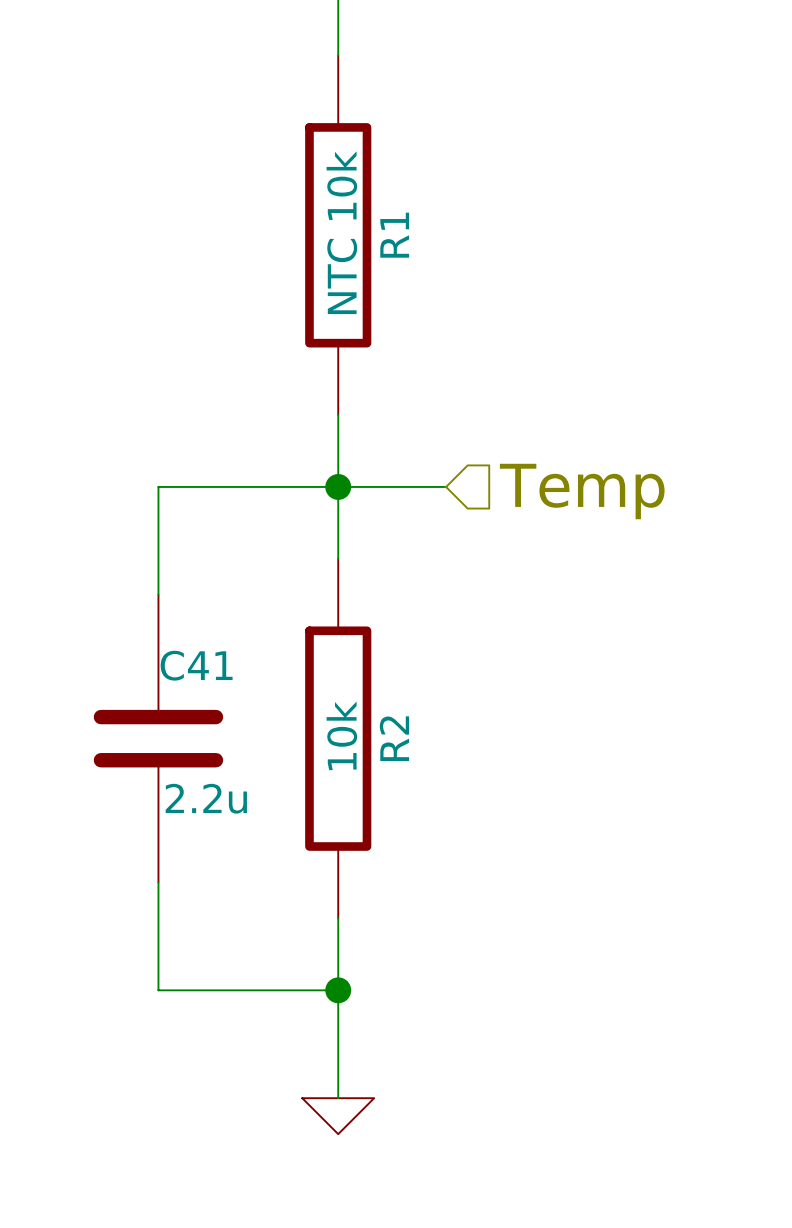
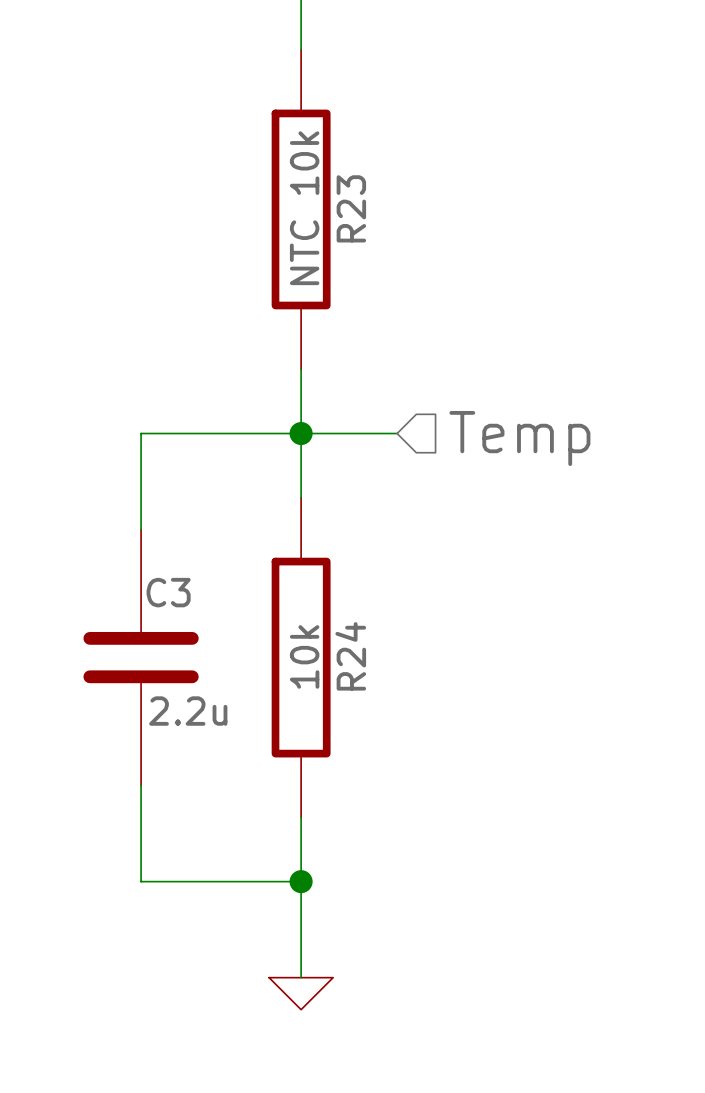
R1 name: R1 (394, 235) -> R23 (351, 208)
C41 name: C41 (196, 665) -> C3 (168, 592)
R2 name: R2 (394, 738) -> R24 (350, 656)

